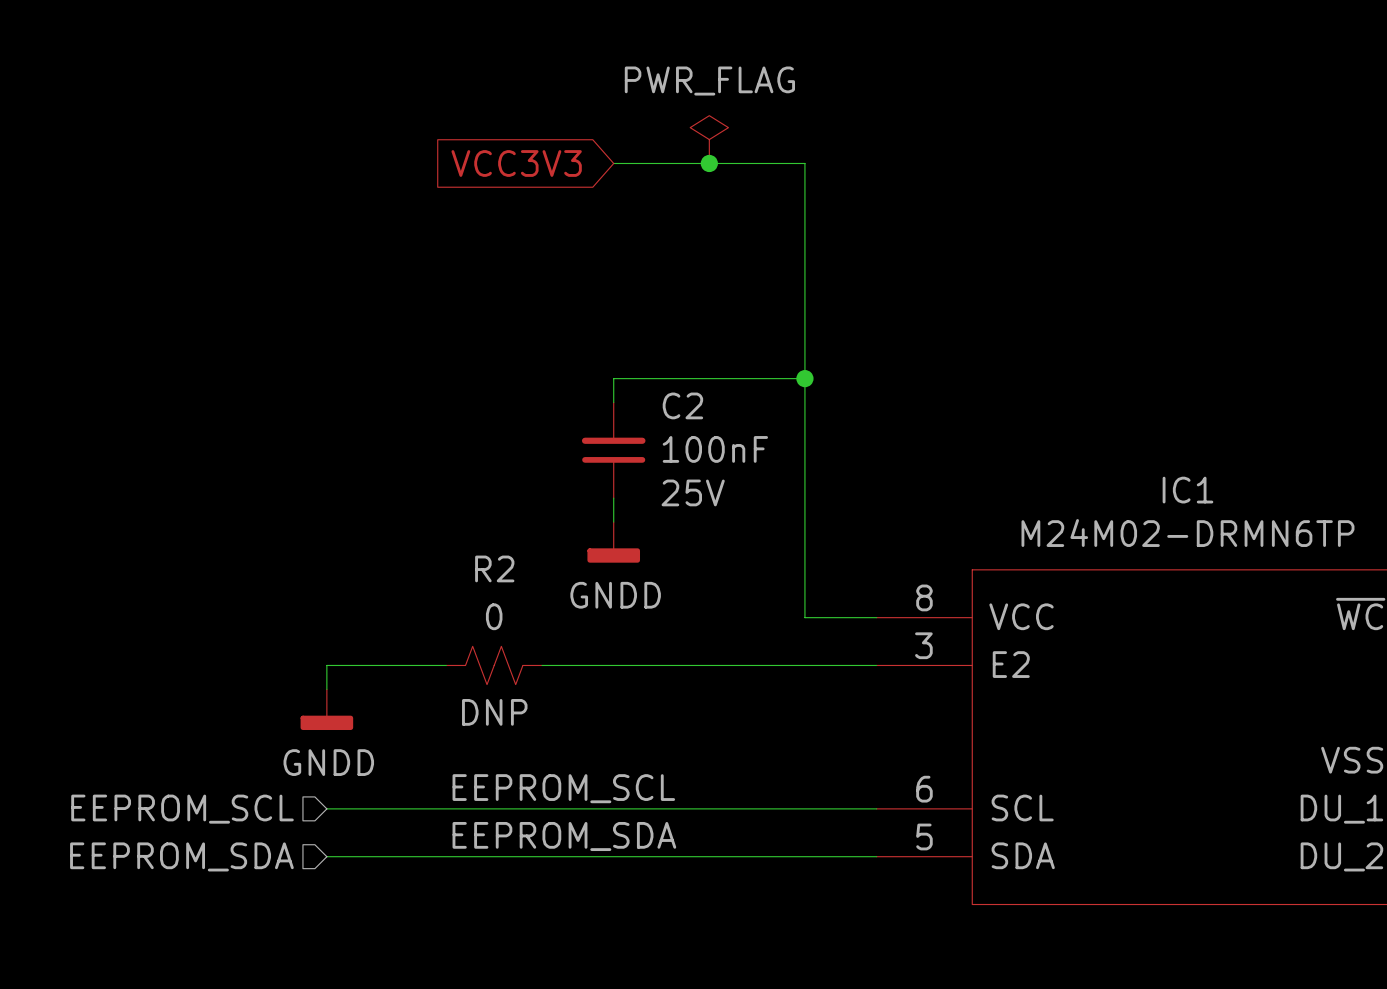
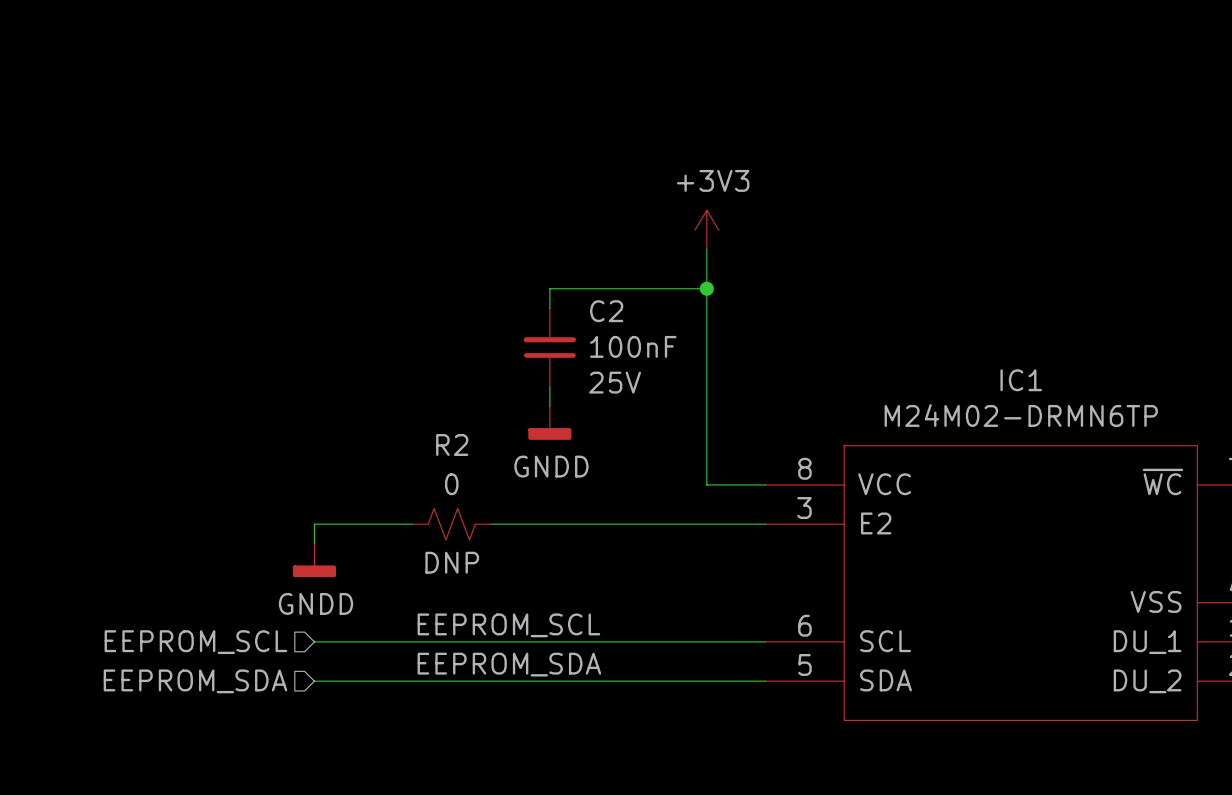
power symbol: PWR_FLAG (709, 139) -> none
global label: VCC3V3 (516, 163) -> none
wire: (613, 163) (804, 163) (804, 330) -> none
junction: (709, 163) -> none
power symbol: none -> +3V3 (706, 229)

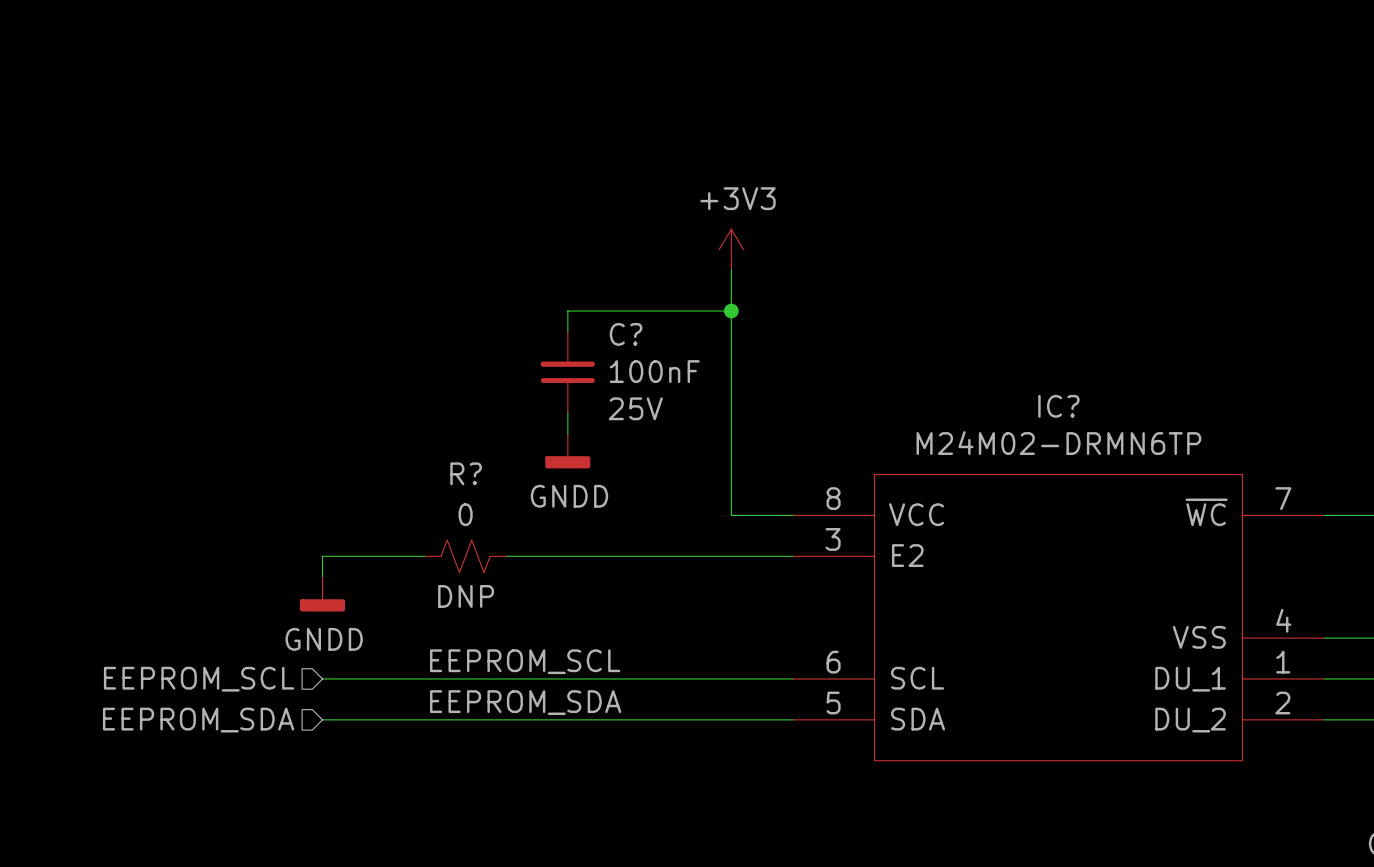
C2 name: C2 (606, 311) -> C? (626, 334)
IC1 name: IC1 (1021, 380) -> IC? (1058, 406)
R2 name: R2 (452, 444) -> R? (466, 473)

